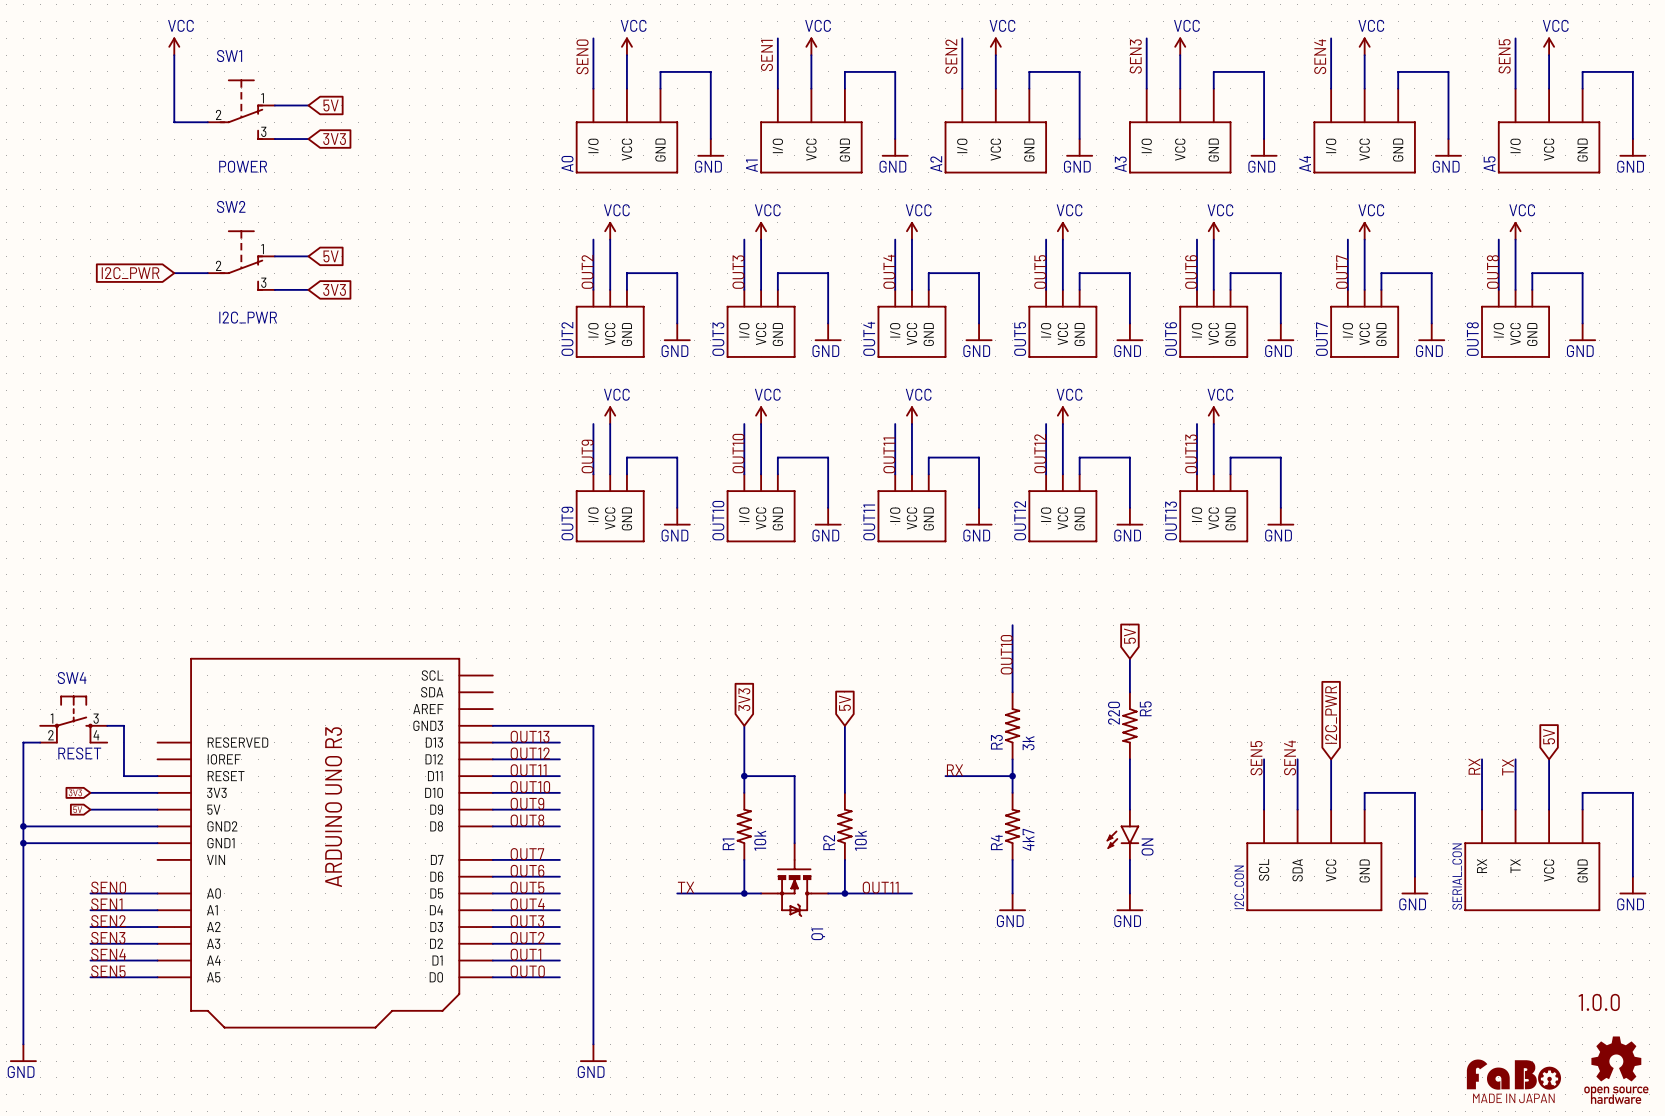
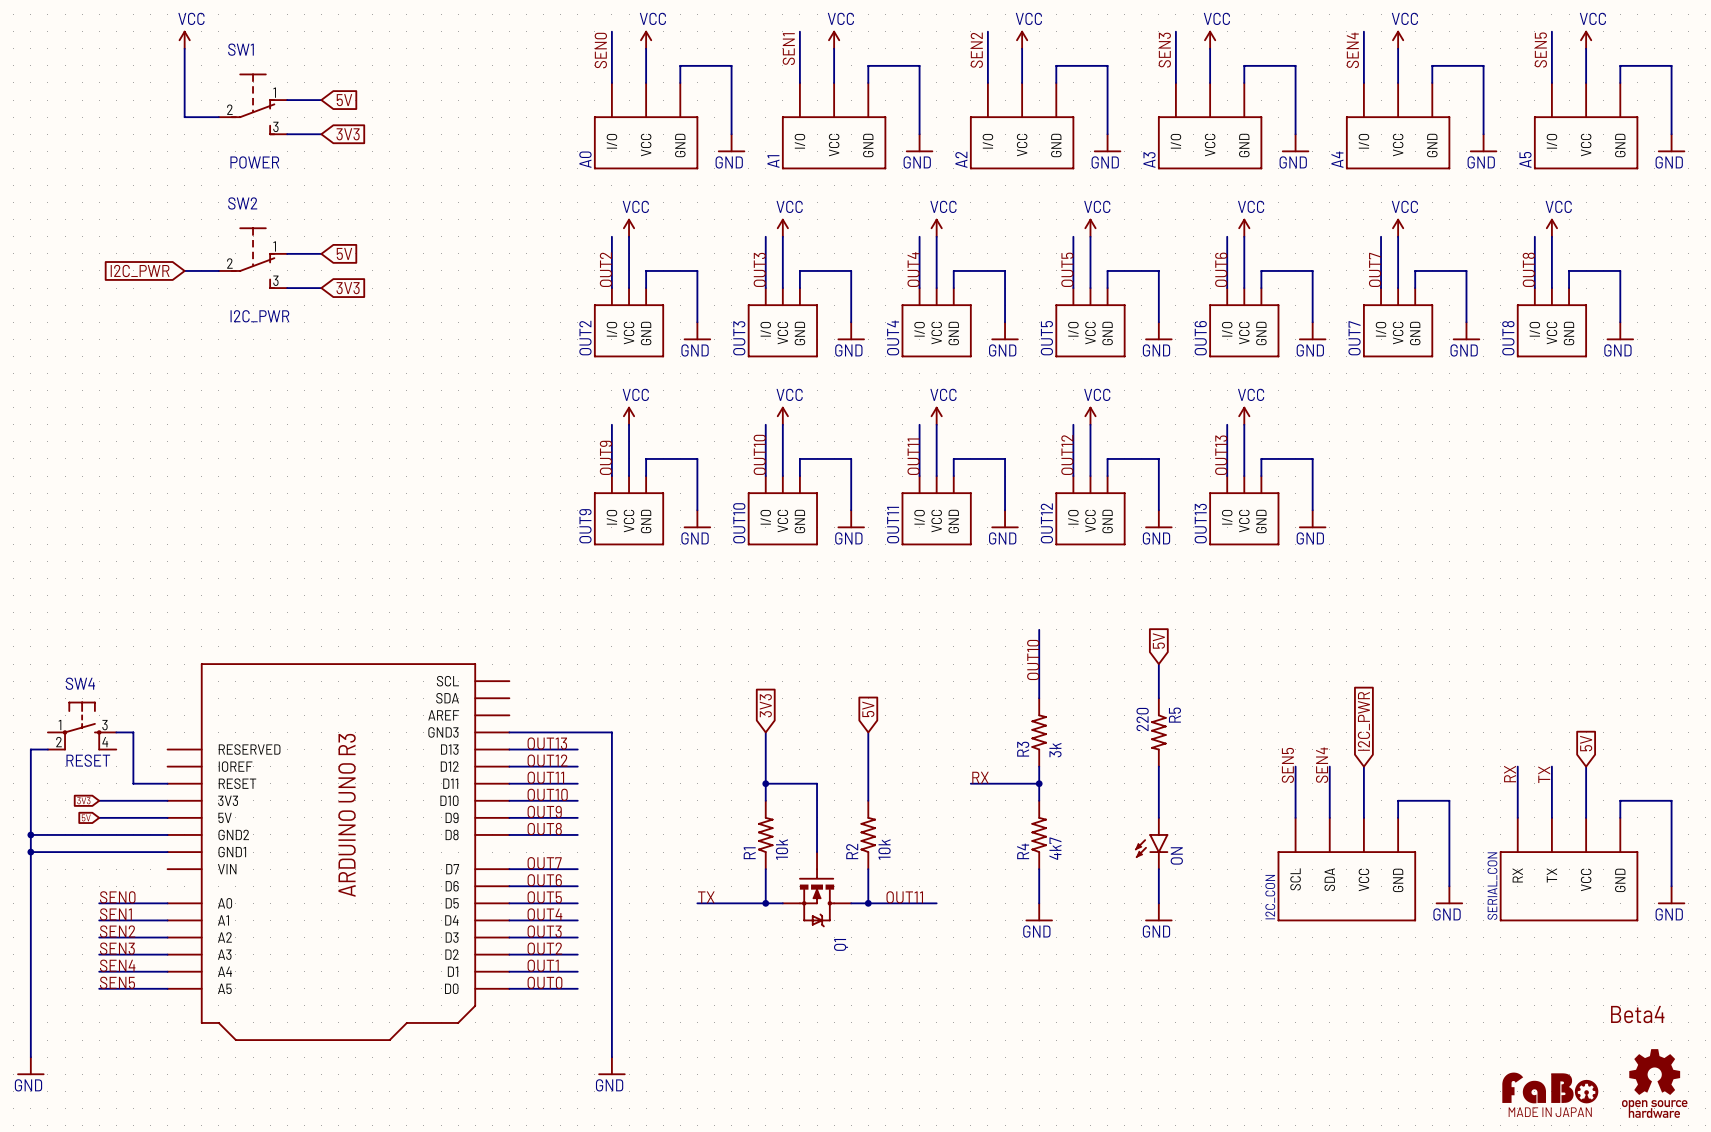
text: 1.0.0 (1599, 1002) -> Beta4 (1637, 1014)

